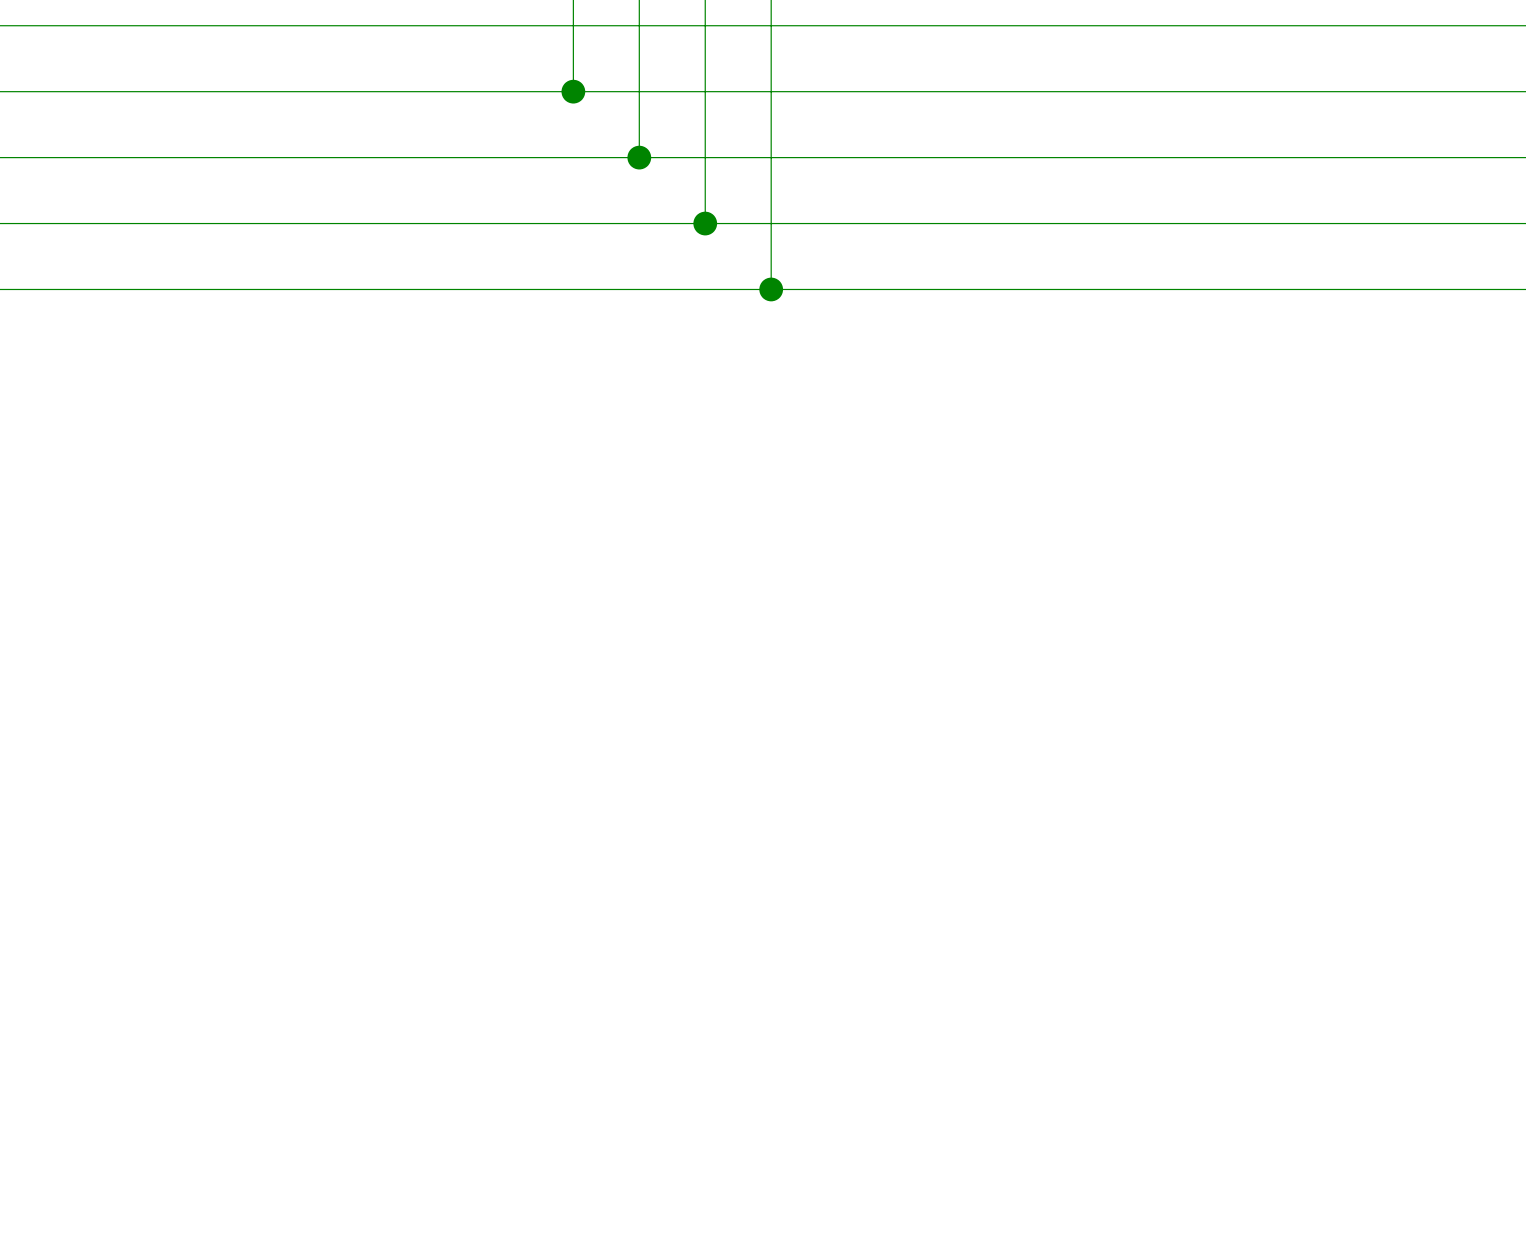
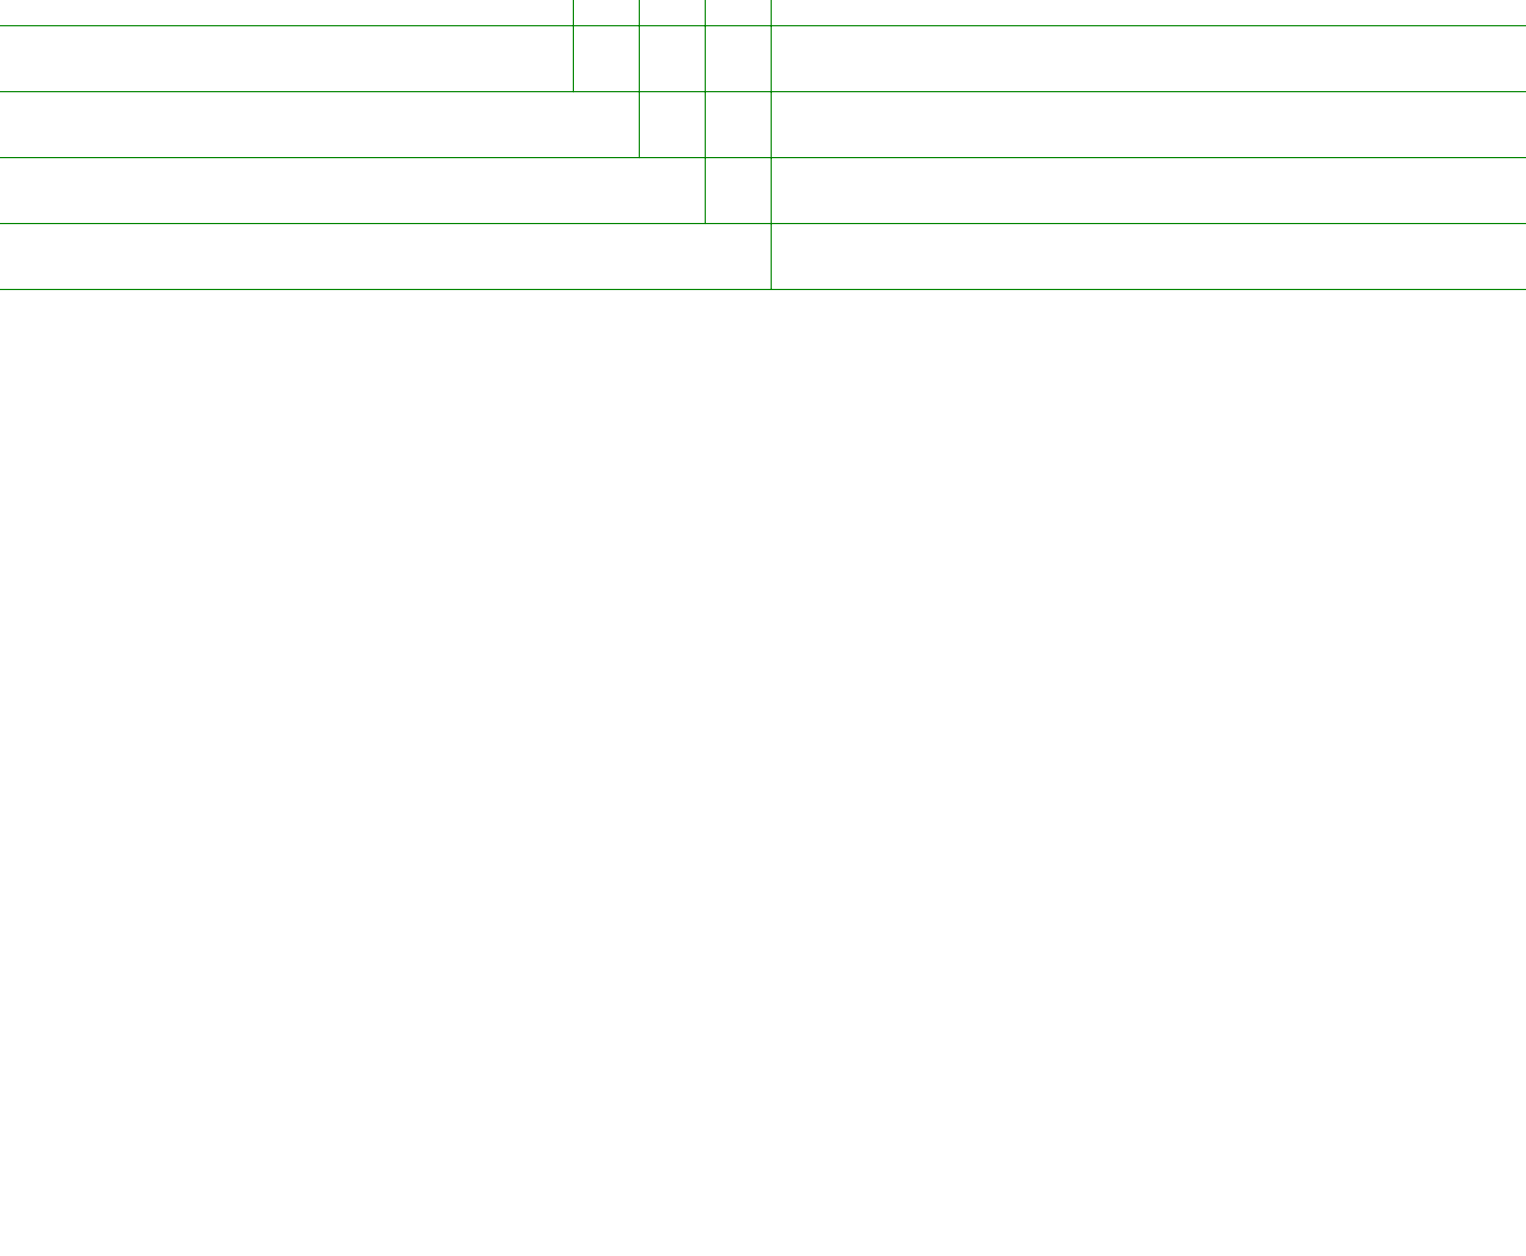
junction: (573, 91) -> none
junction: (639, 157) -> none
junction: (705, 223) -> none
junction: (771, 289) -> none

